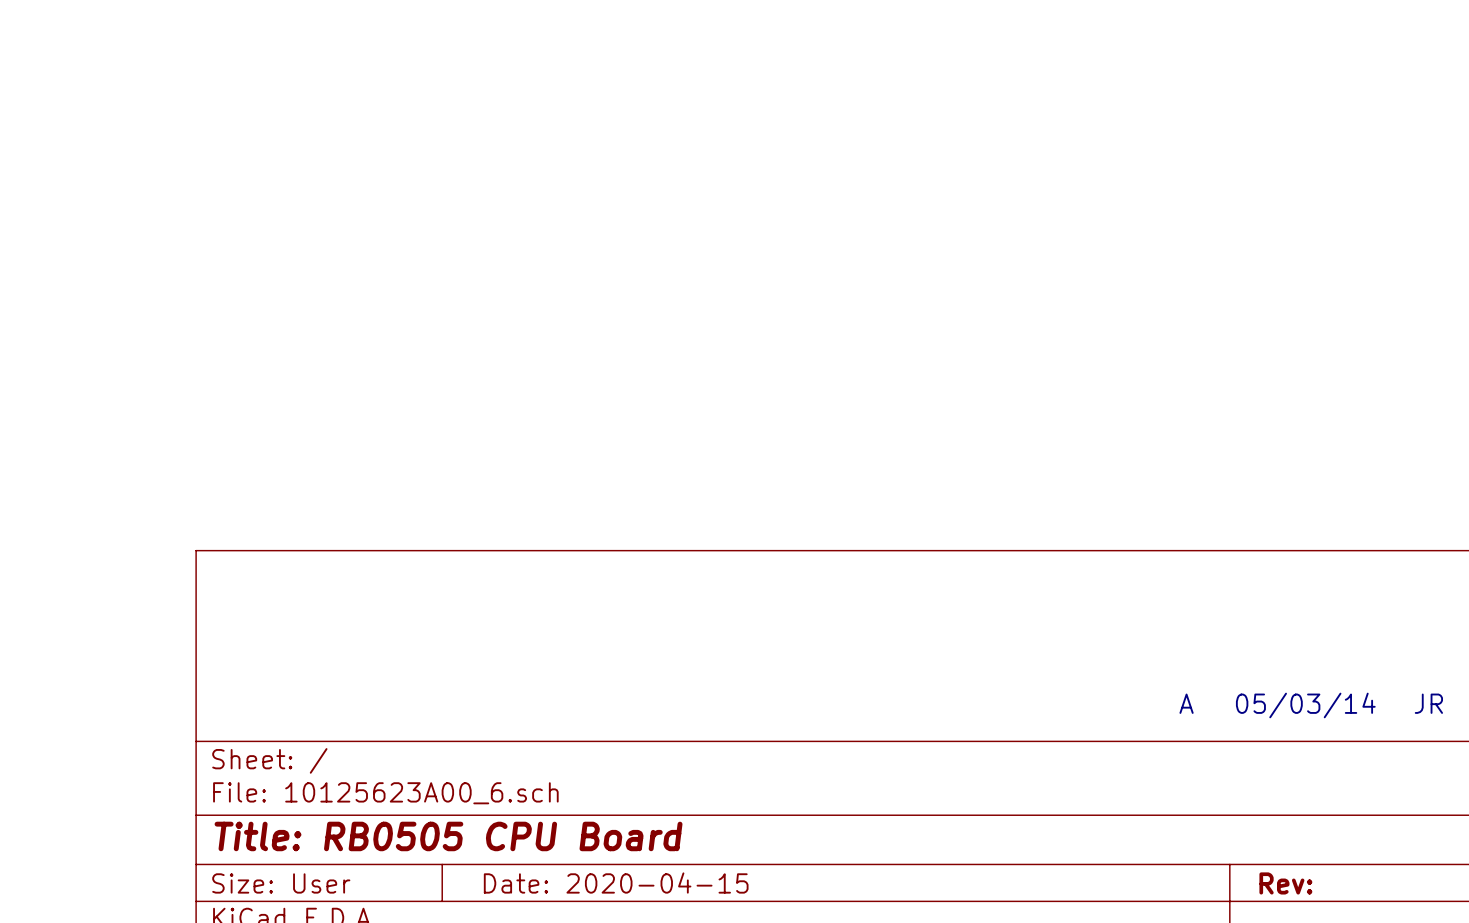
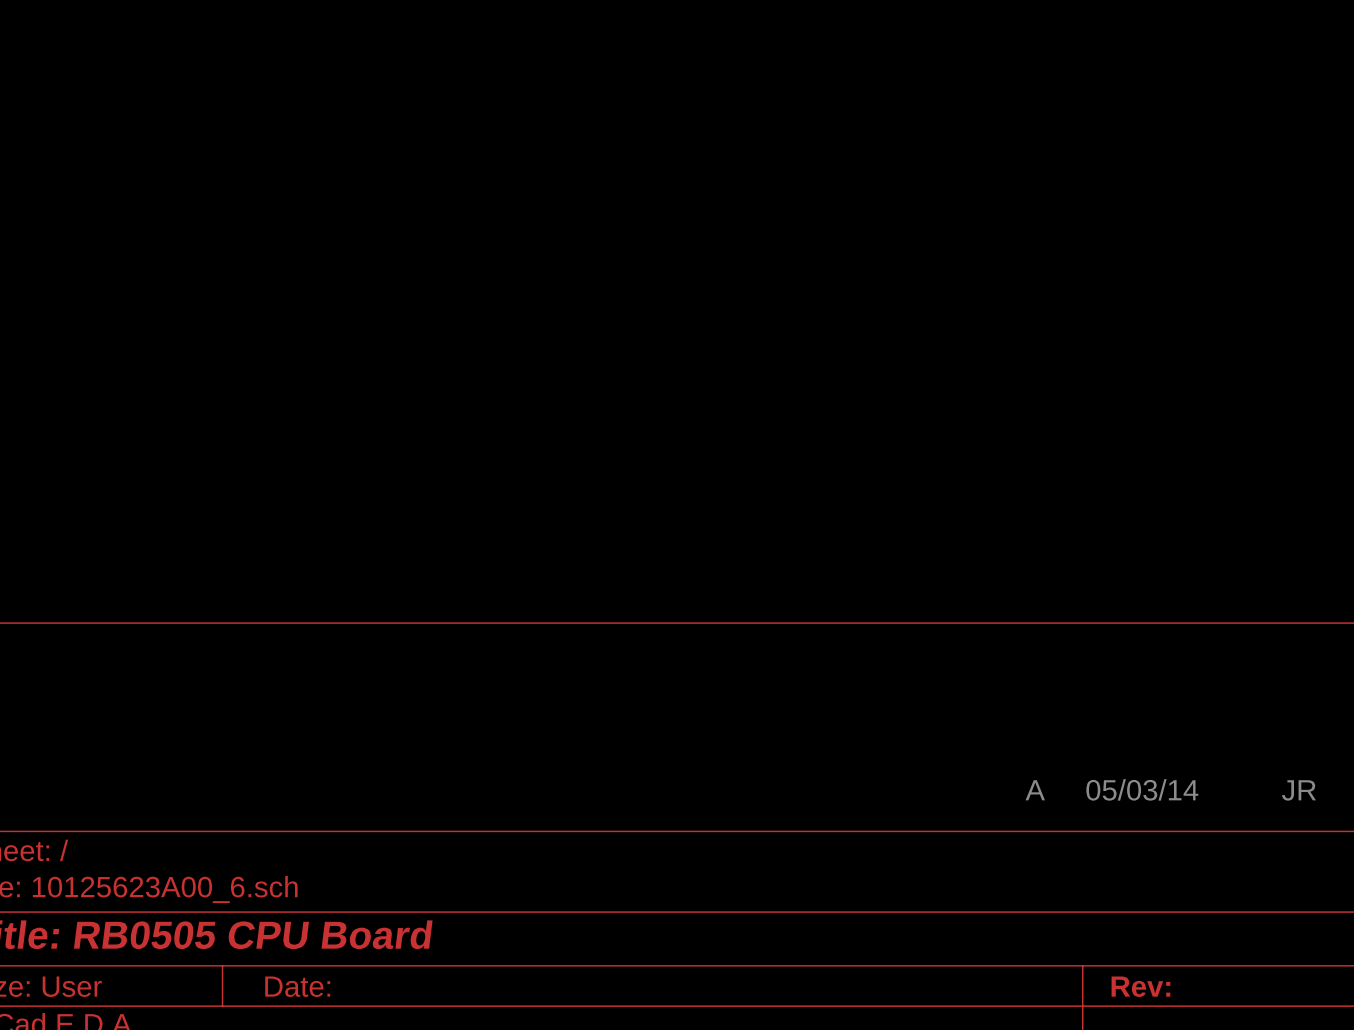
title block: Date: 2020-04-15 (616, 883) -> Date: (297, 986)

